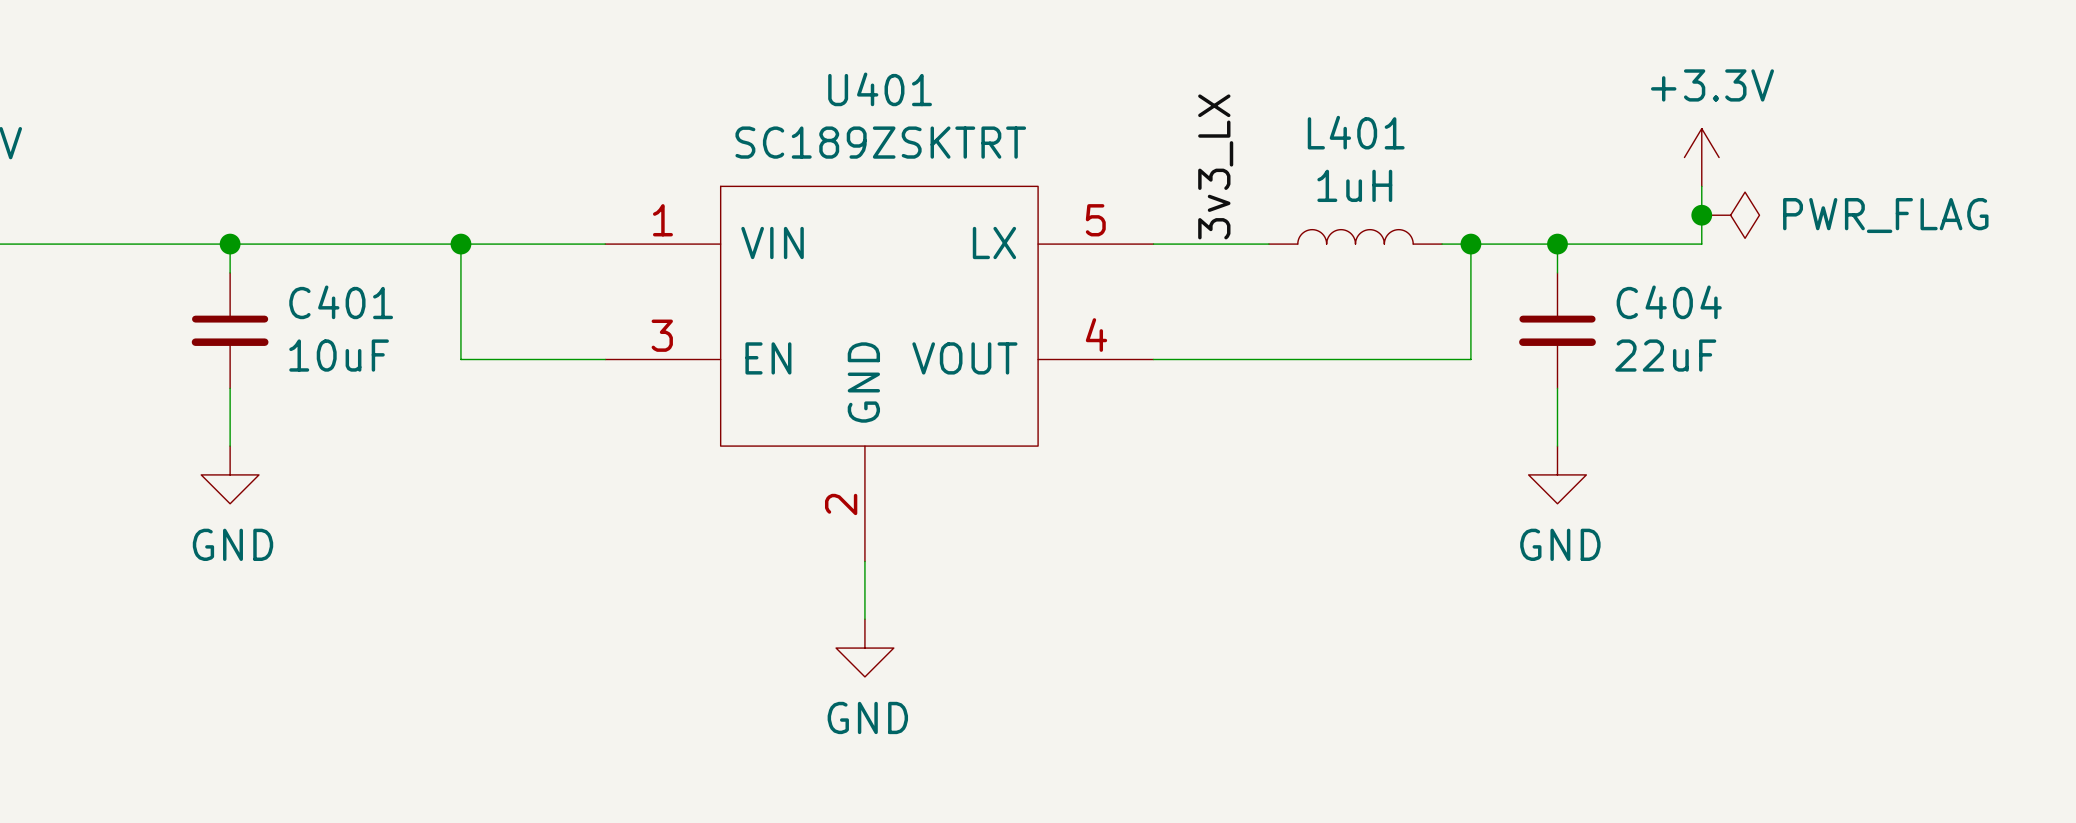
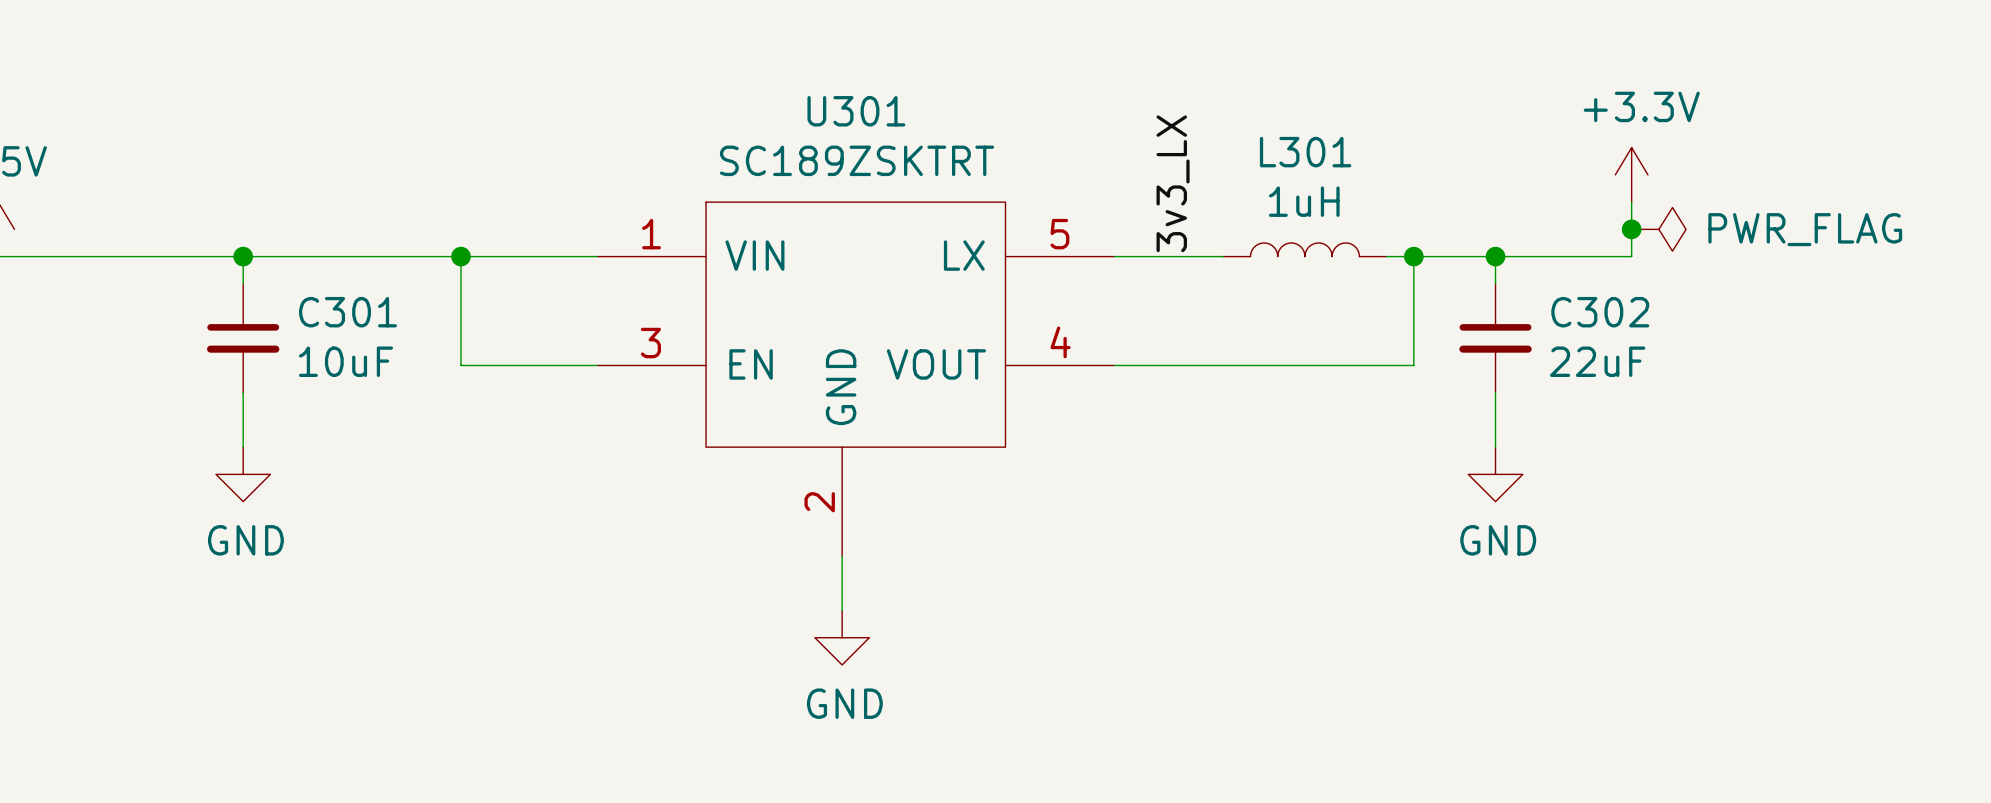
U401 name: U401 (880, 89) -> U301 (856, 111)
L401 name: L401 (1356, 132) -> L301 (1305, 152)
C401 name: C401 (341, 302) -> C301 (347, 312)
C404 name: C404 (1669, 302) -> C302 (1600, 312)

